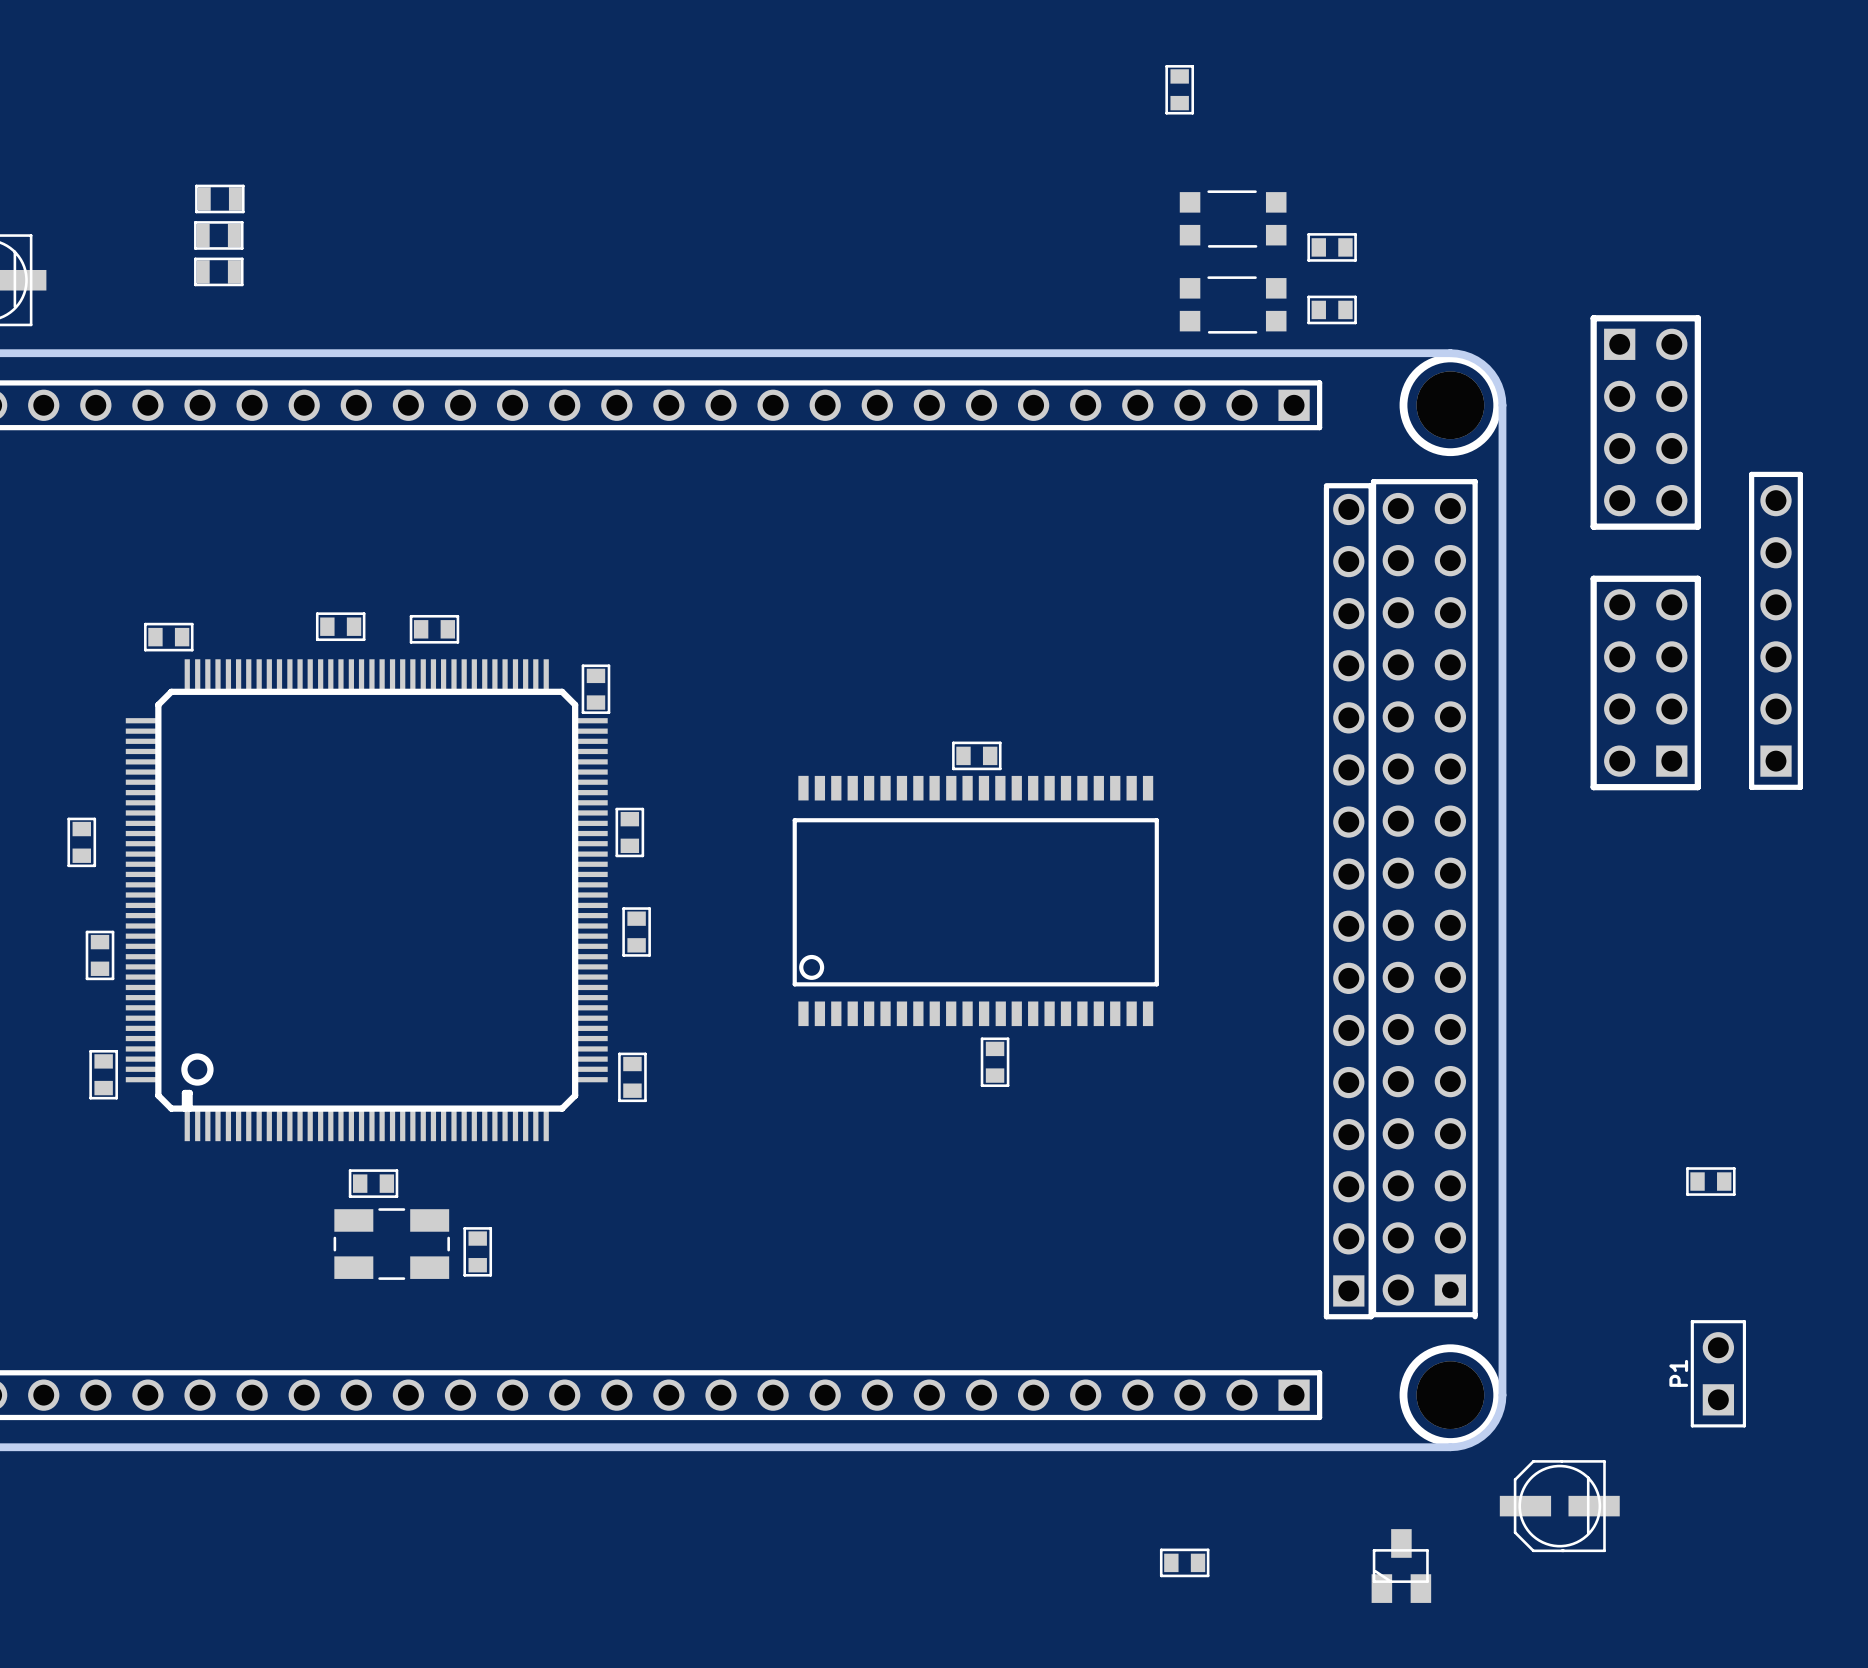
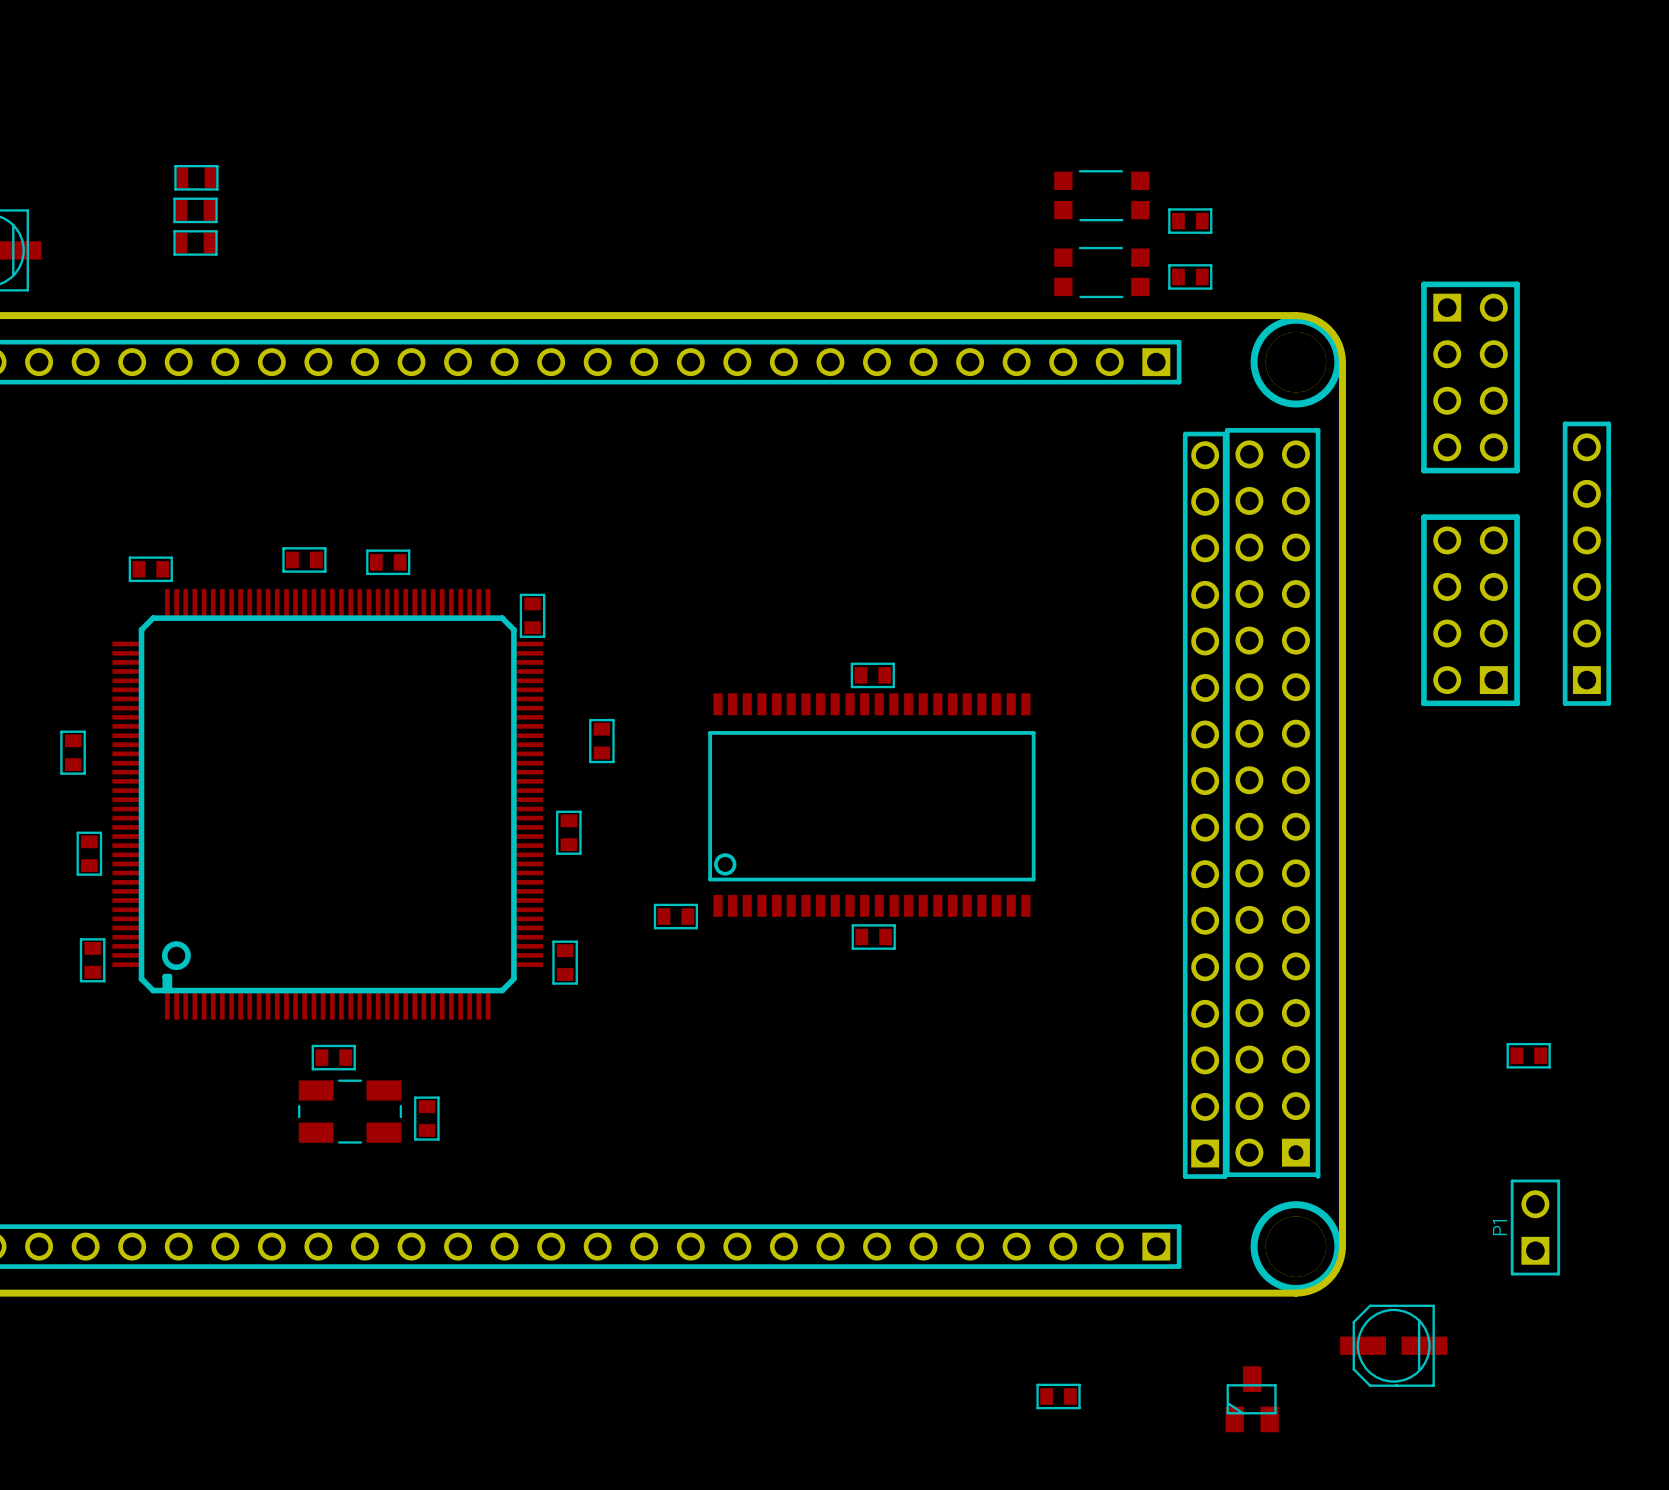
part: (1179, 89) -> none
part position: (629, 832) -> (601, 741)
part: none -> (675, 916)
part rotation: 0° (995, 1062) -> 90° clockwise (873, 937)

